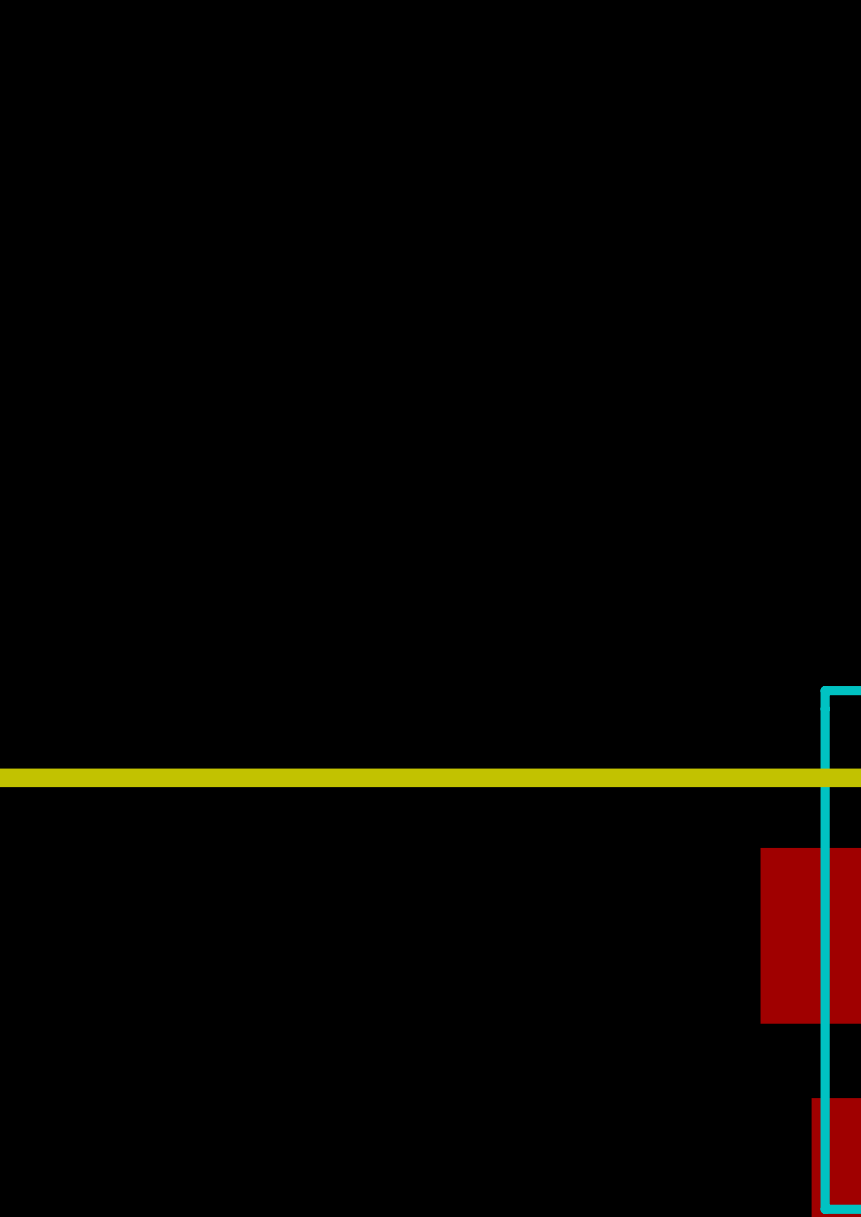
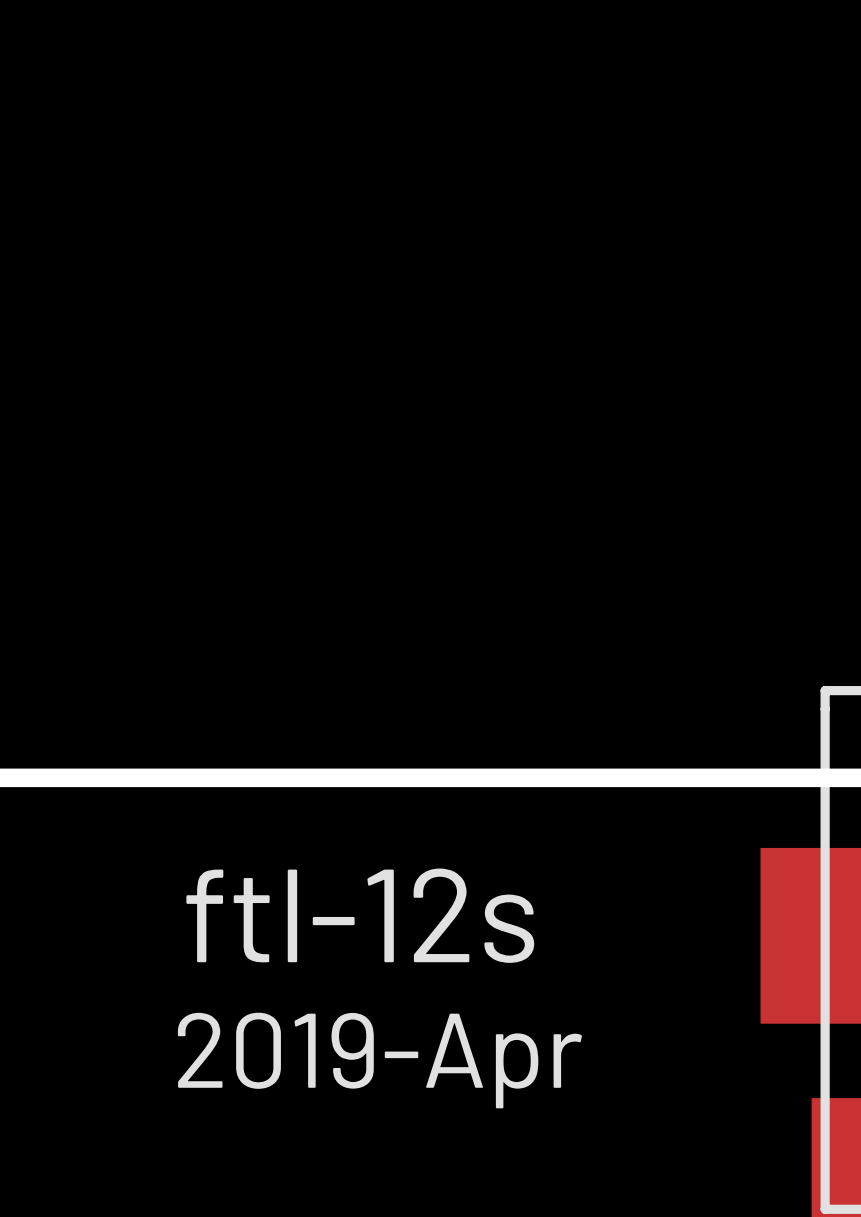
text: none -> ftl-12s (360, 915)
text: none -> 2019-Apr (379, 1060)

